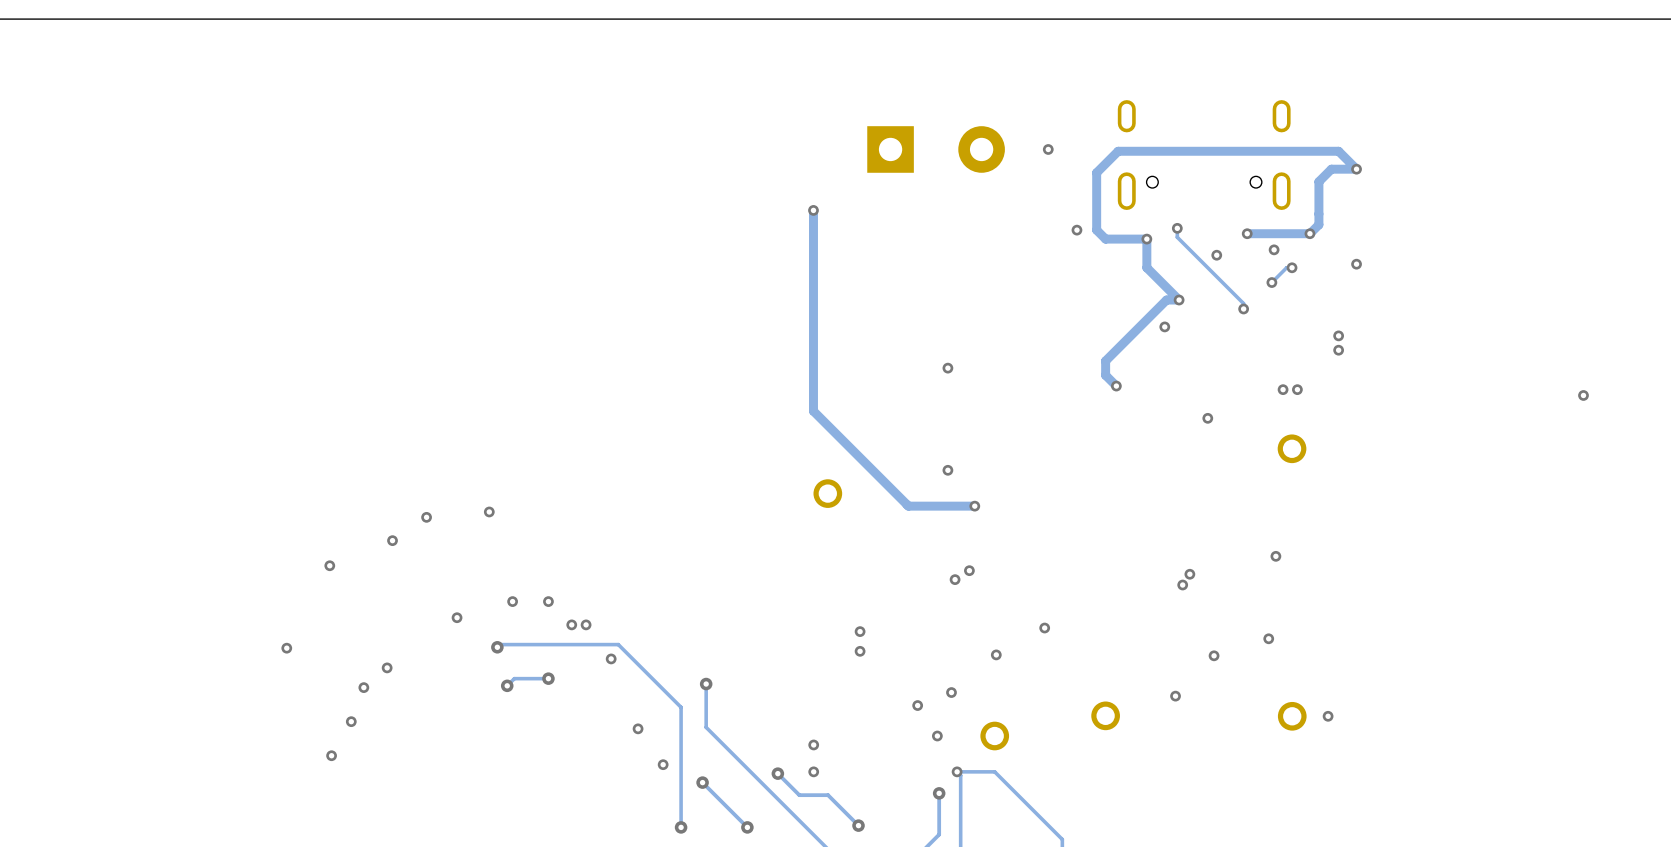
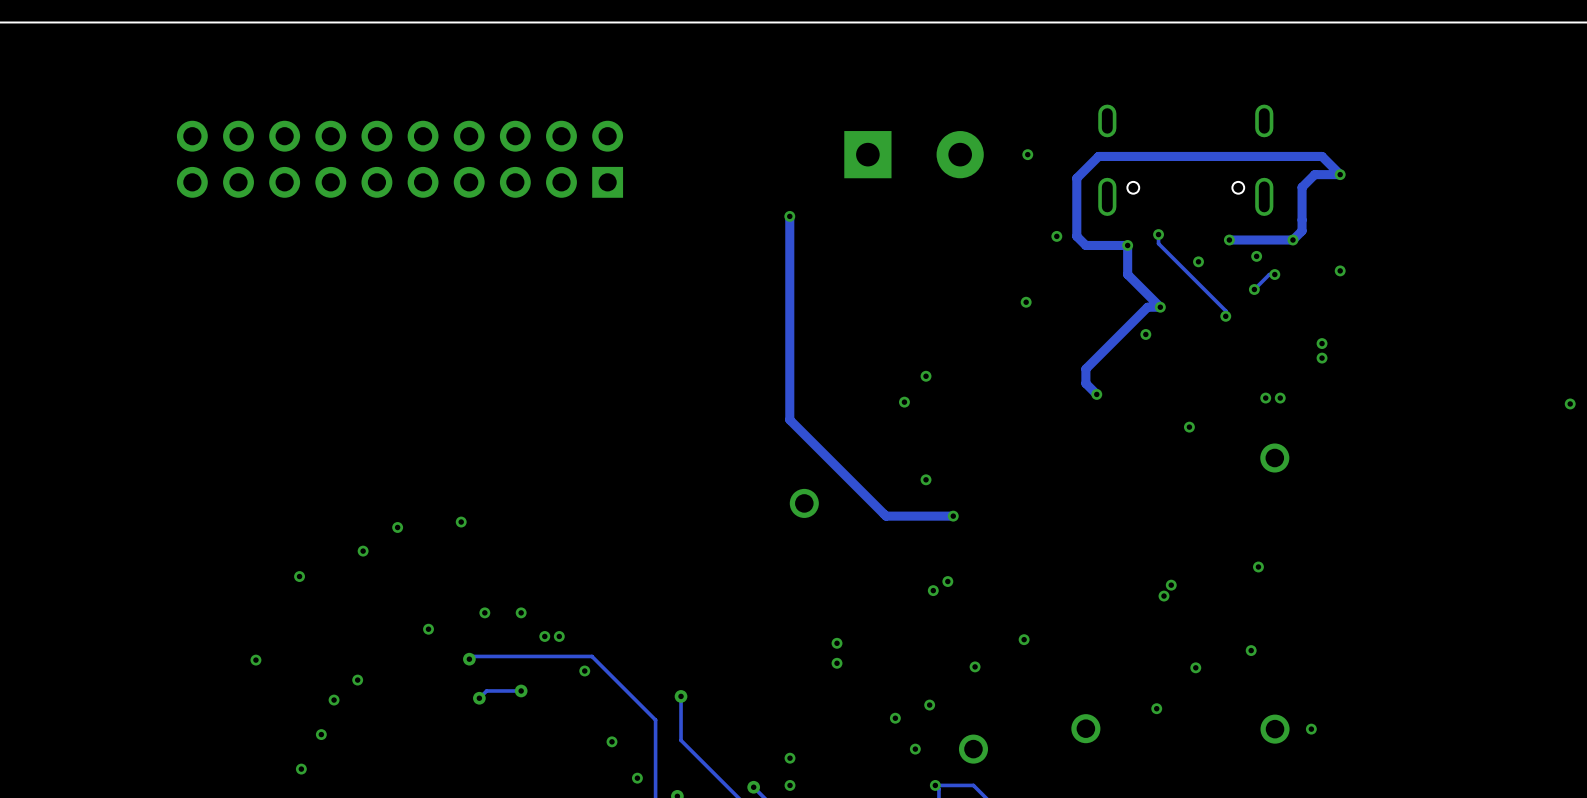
part: none -> (400, 159)
via: none -> (1026, 302)
via: none -> (904, 402)

